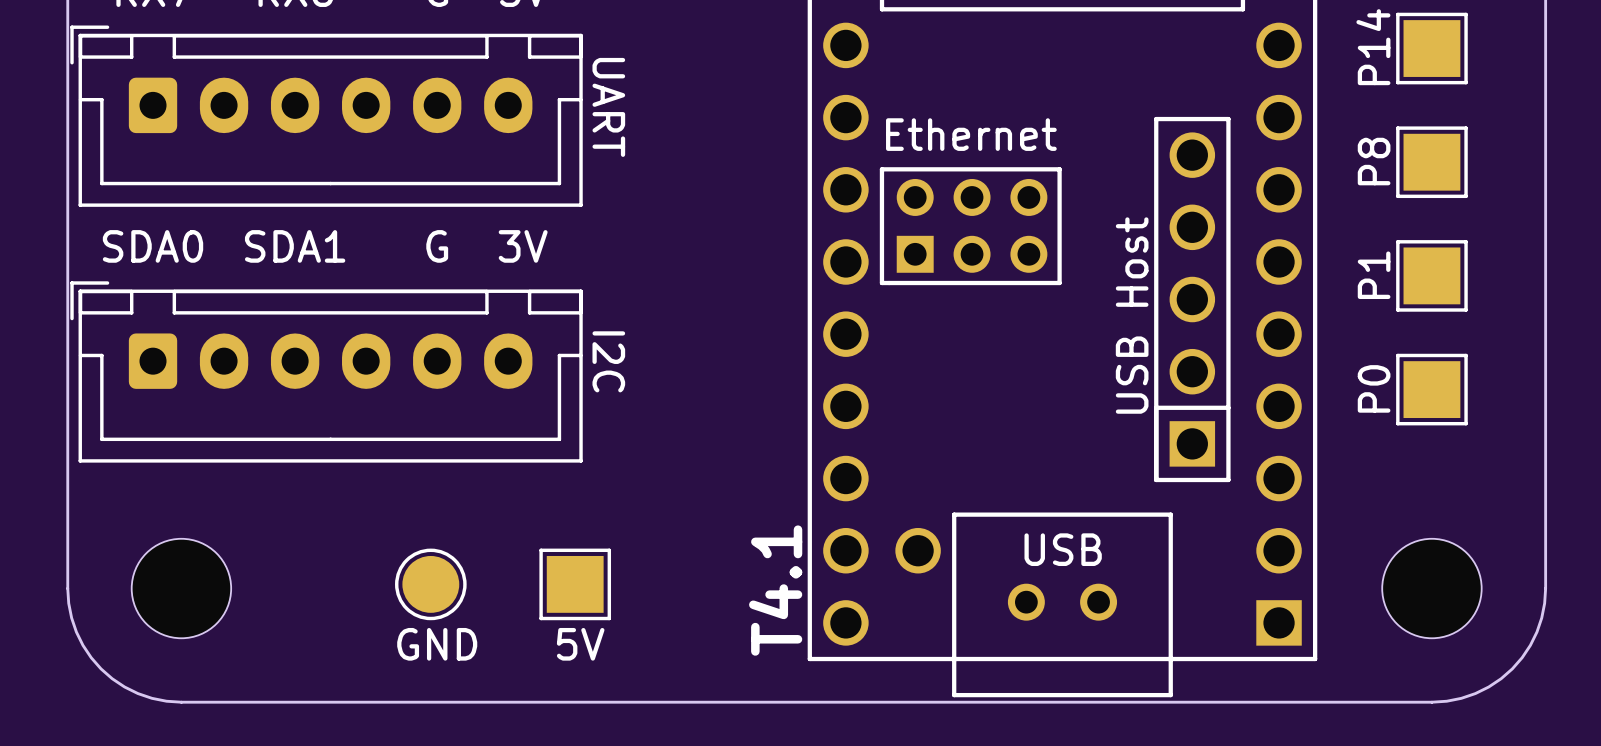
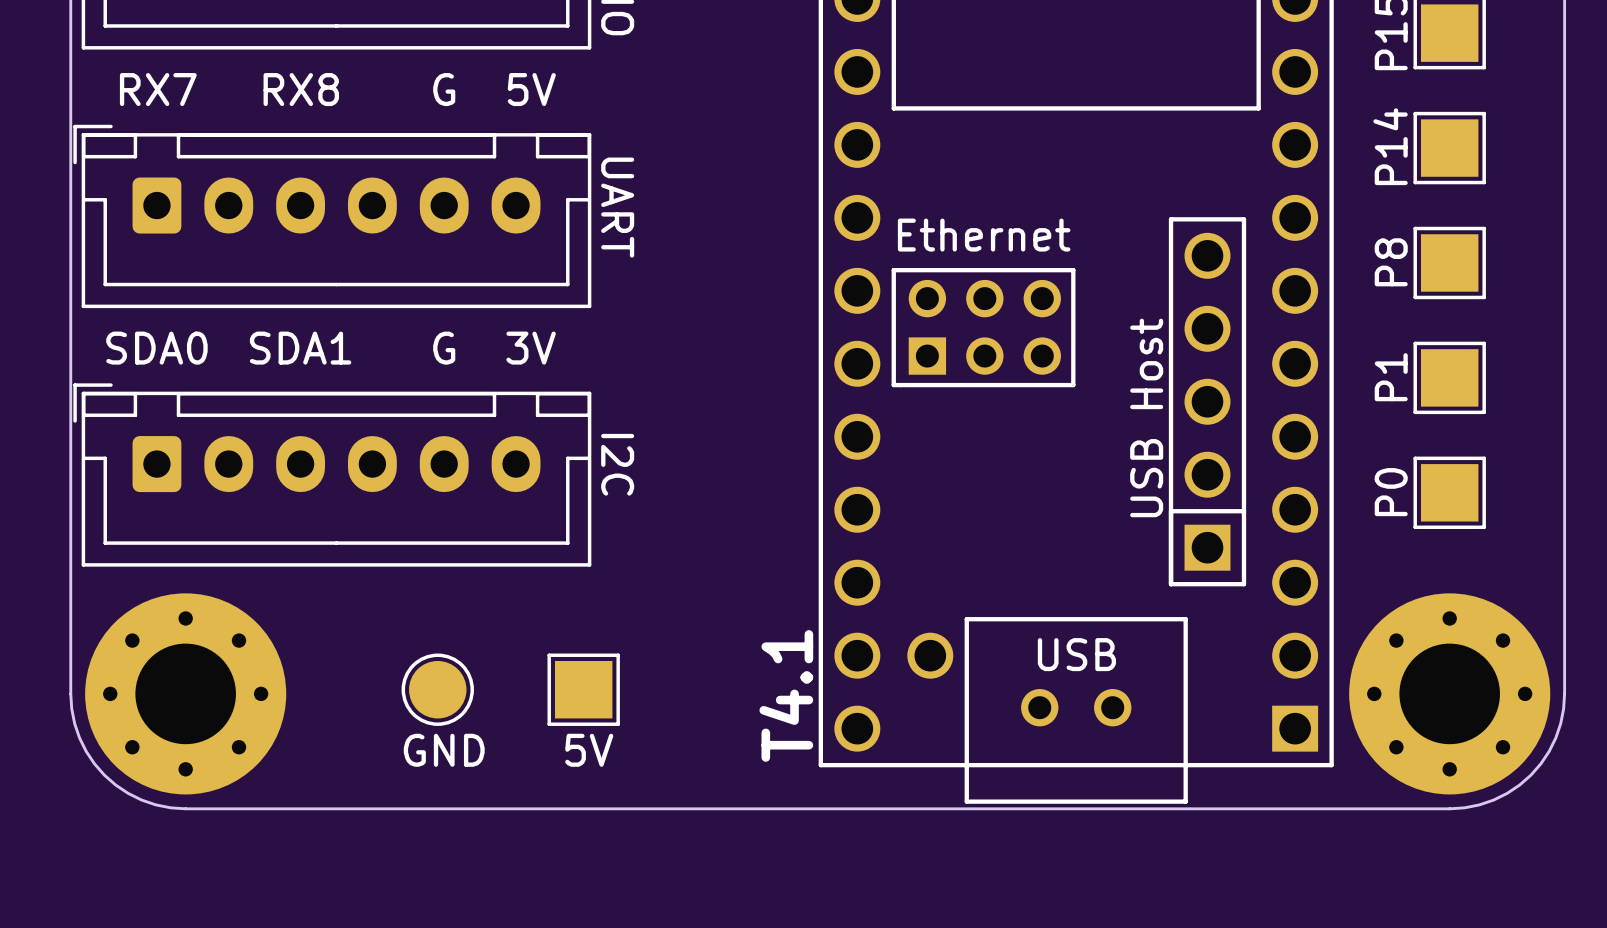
part footprint: [131, 538, 232, 639] -> [85, 593, 287, 795]
part footprint: [1382, 538, 1482, 639] -> [1349, 593, 1551, 795]

